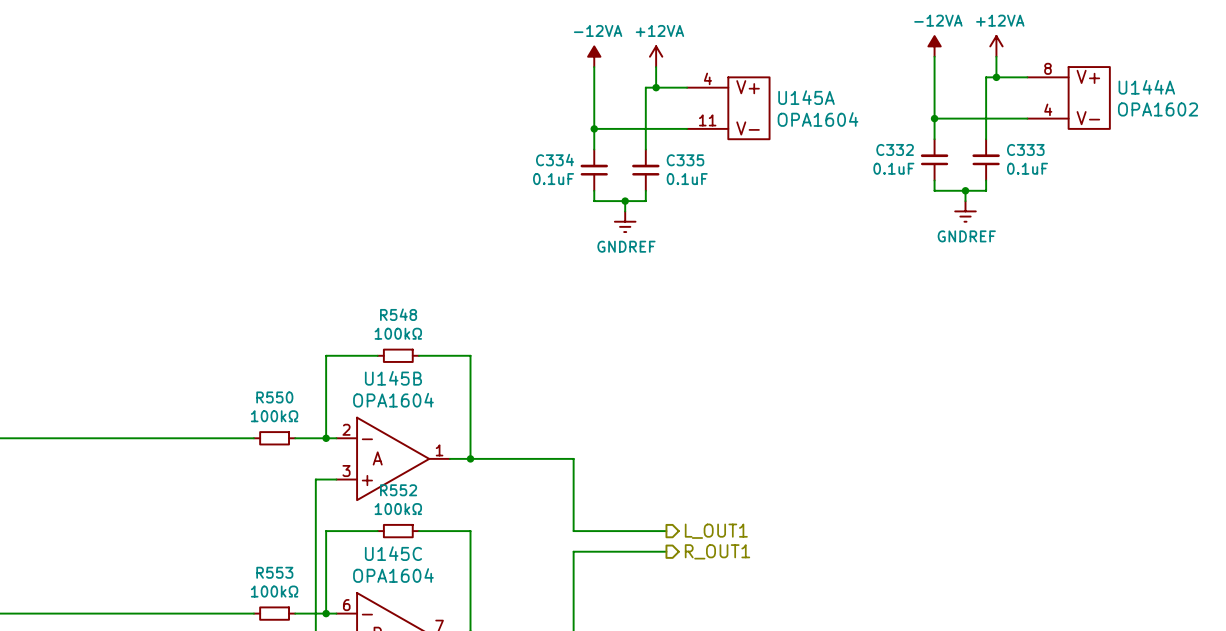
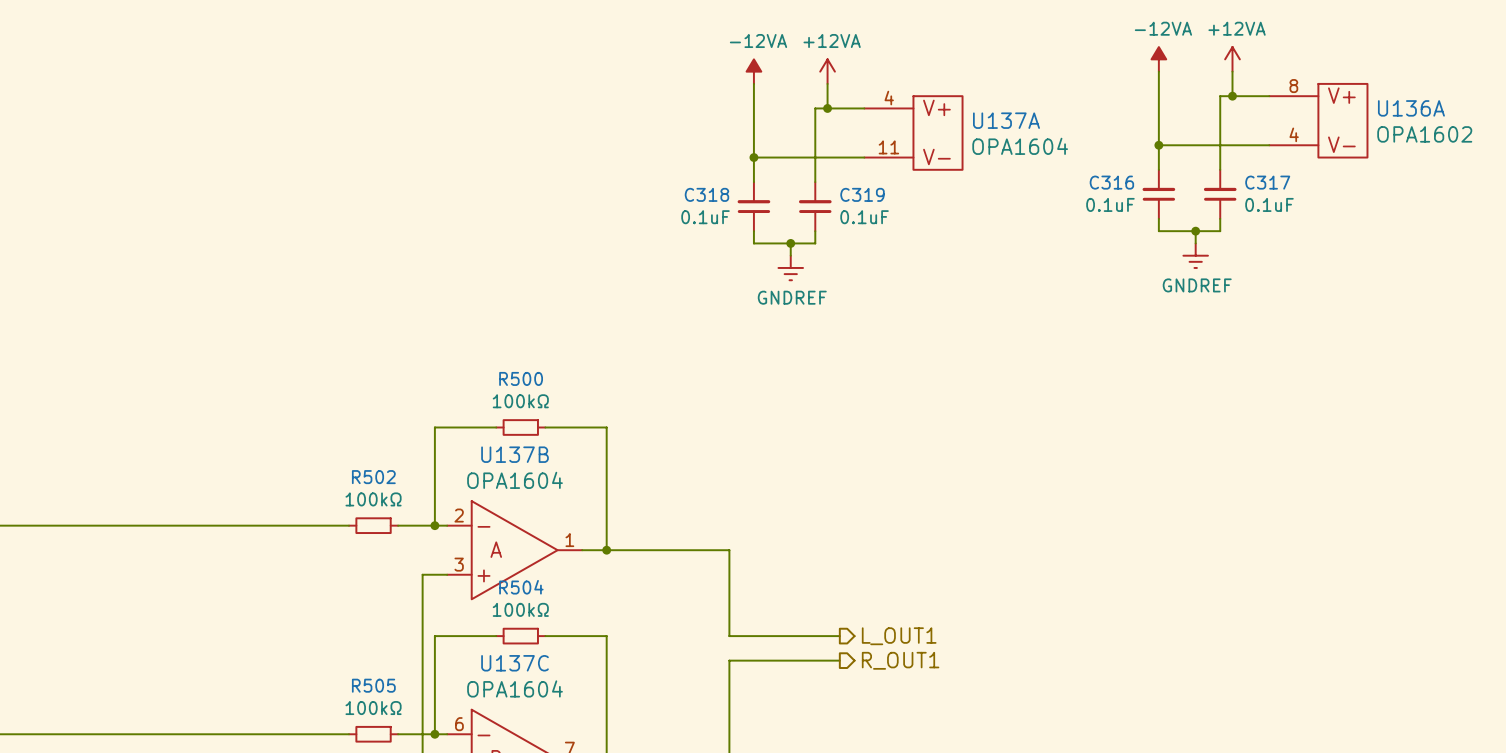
U144A name: U144A (1146, 87) -> U136A (1411, 108)
U145A name: U145A (806, 97) -> U137A (1006, 120)
C332 name: C332 (895, 149) -> C316 (1111, 182)
C333 name: C333 (1025, 149) -> C317 (1267, 182)
C334 name: C334 (555, 160) -> C318 (706, 194)
C335 name: C335 (685, 160) -> C319 (862, 194)
R548 name: R548 (398, 314) -> R500 (521, 378)
U145B name: U145B (393, 378) -> U137B (515, 454)
R550 name: R550 (274, 397) -> R502 (373, 477)
R552 name: R552 (398, 490) -> R504 (521, 587)
U145C name: U145C (393, 553) -> U137C (515, 663)
R553 name: R553 (274, 572) -> R505 (373, 685)

